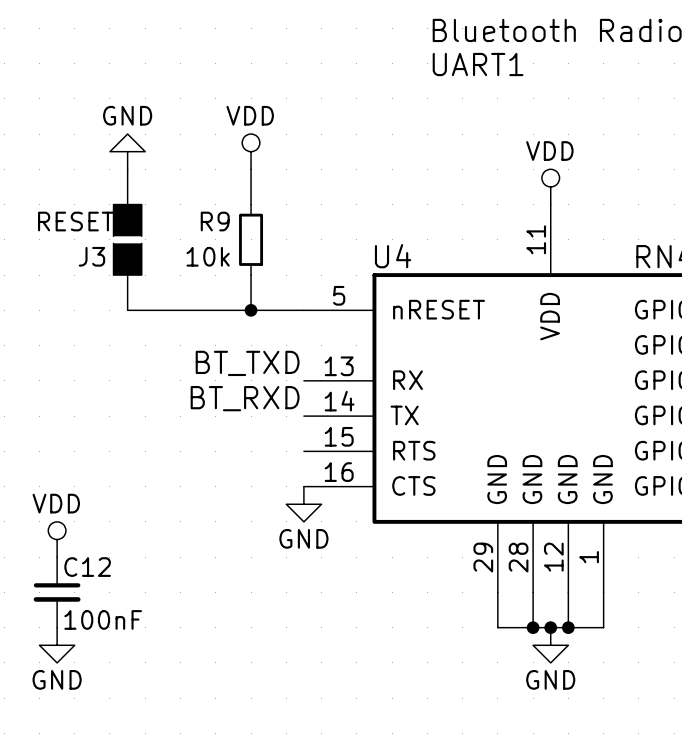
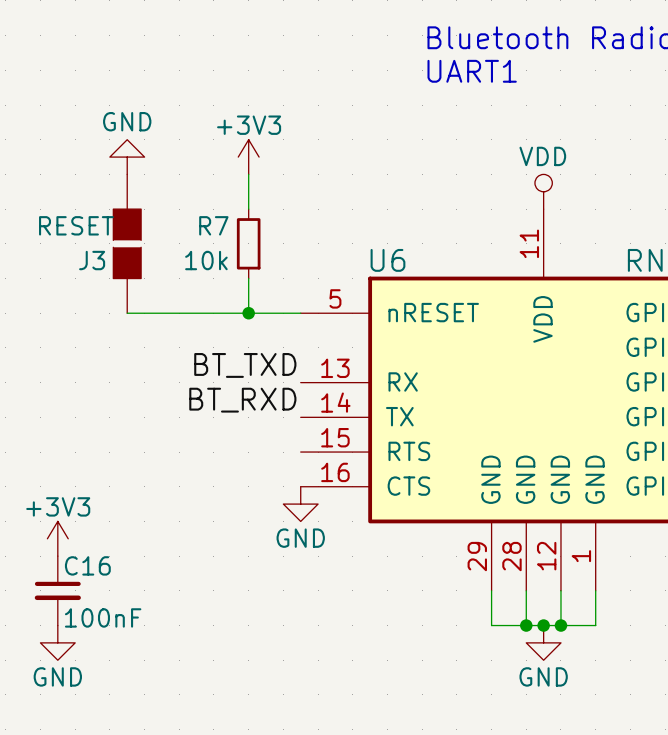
power symbol: VDD (251, 151) -> +3V3 (248, 157)
R9 name: R9 (215, 221) -> R7 (213, 225)
U4 name: U4 (393, 256) -> U6 (387, 260)
power symbol: VDD (57, 539) -> +3V3 (57, 538)
C12 name: C12 (87, 567) -> C16 (87, 565)

